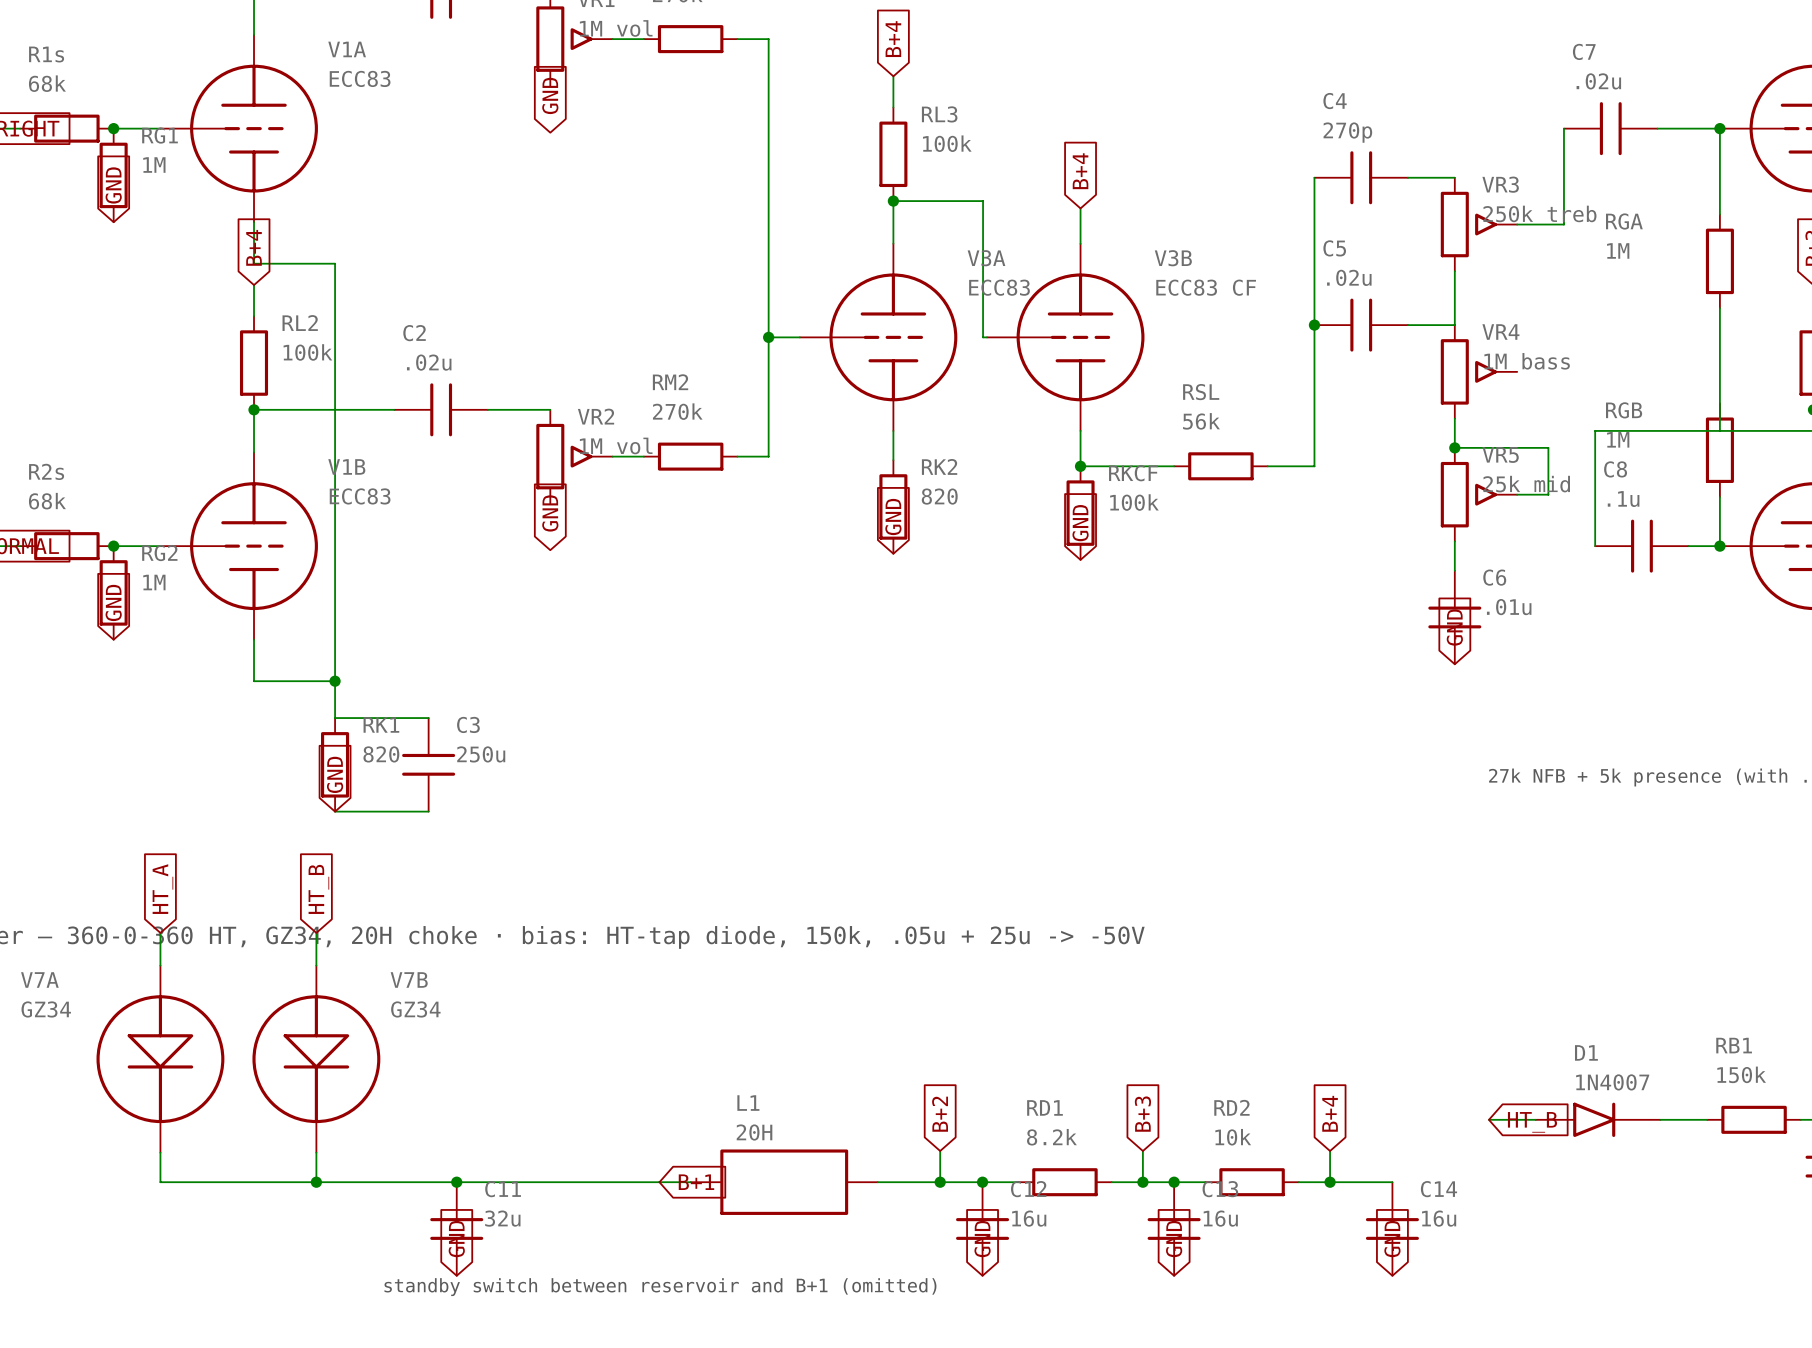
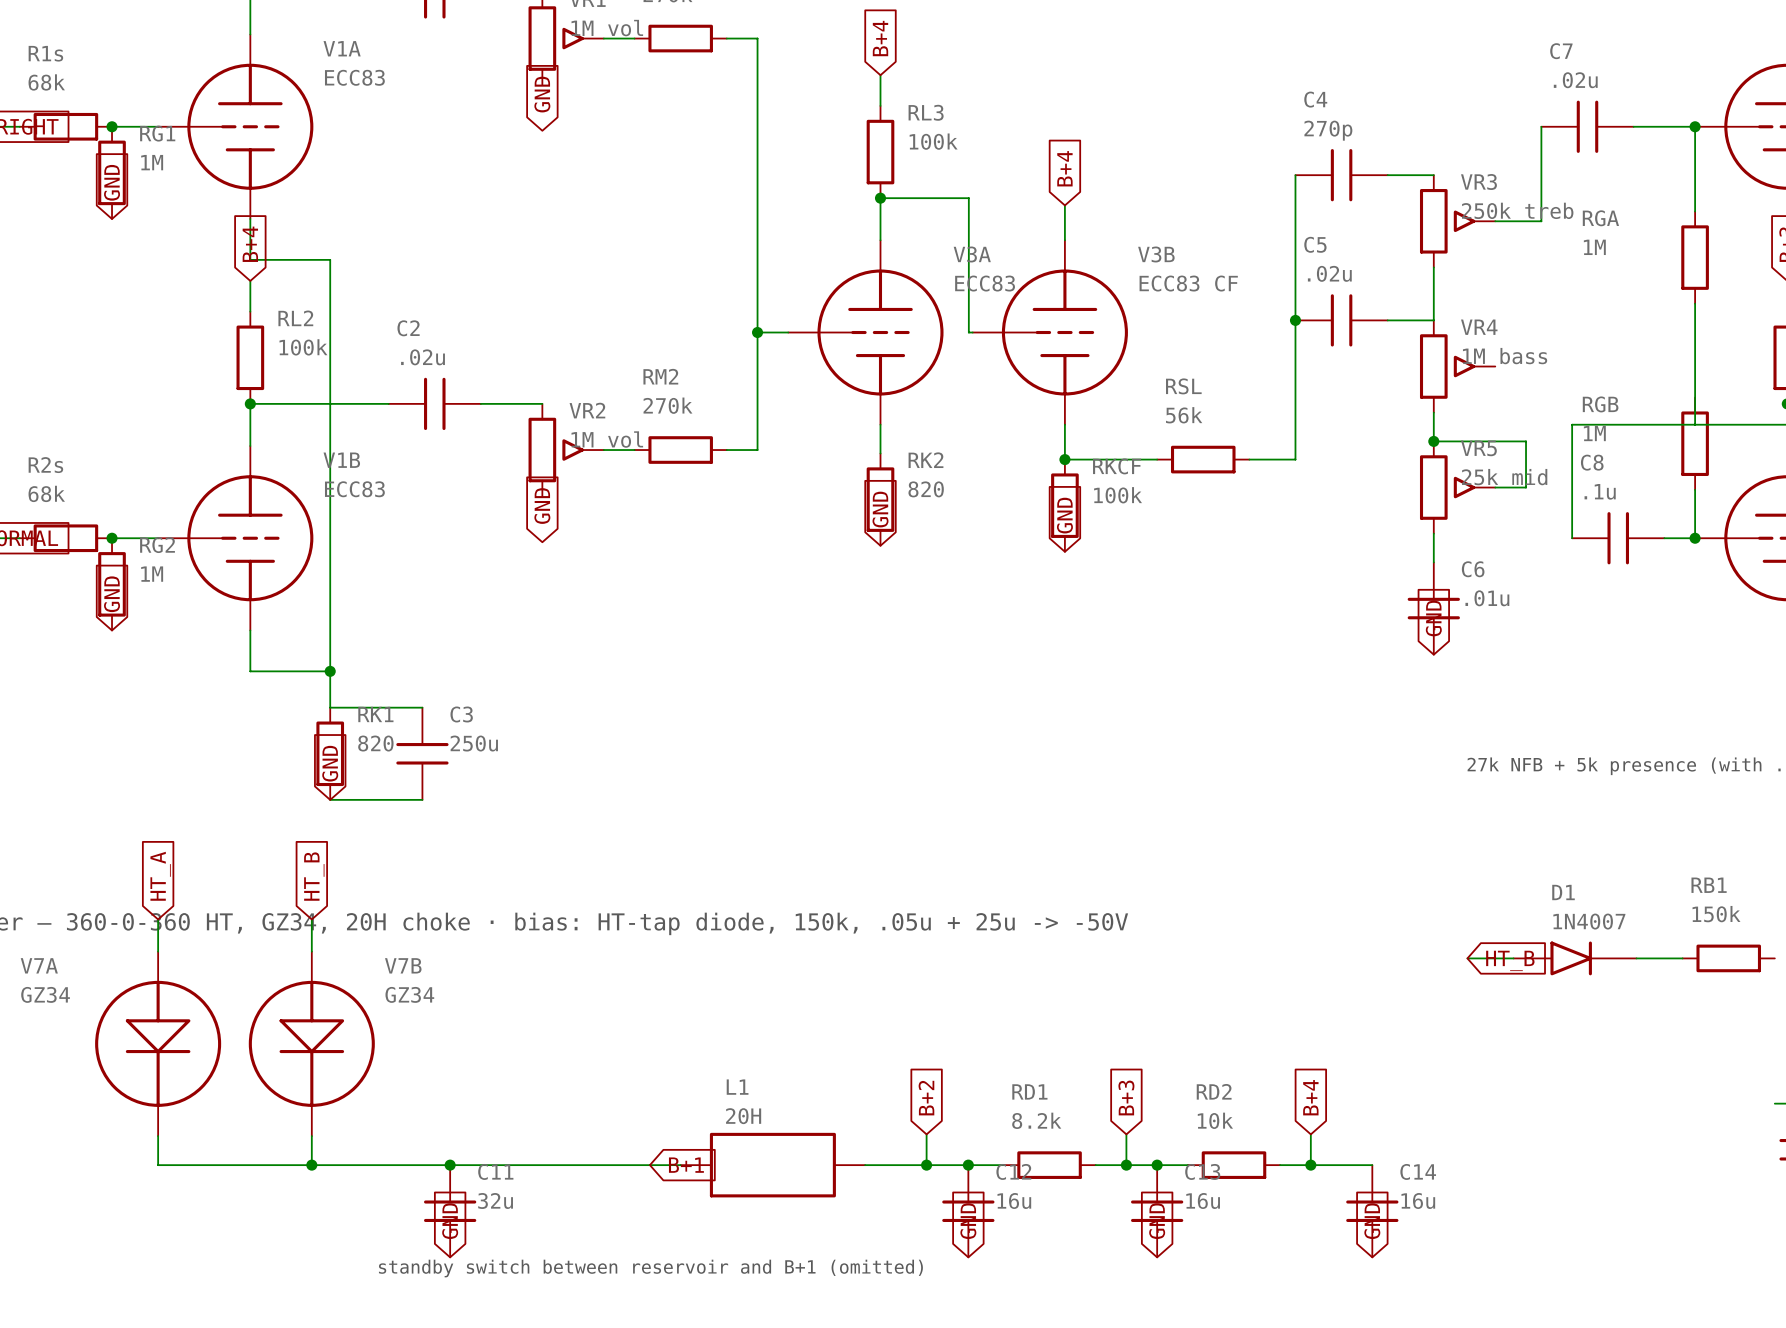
wire: (1488, 1119) (1535, 1119) -> (1467, 958) (1513, 958)
D1 position: (1598, 1119) -> (1575, 958)
wire: (1660, 1119) (1707, 1119) -> (1636, 958) (1682, 958)
RB1 position: (1754, 1119) -> (1728, 958)
global label position: HT_B (1532, 1122) -> HT_B (1510, 960)

